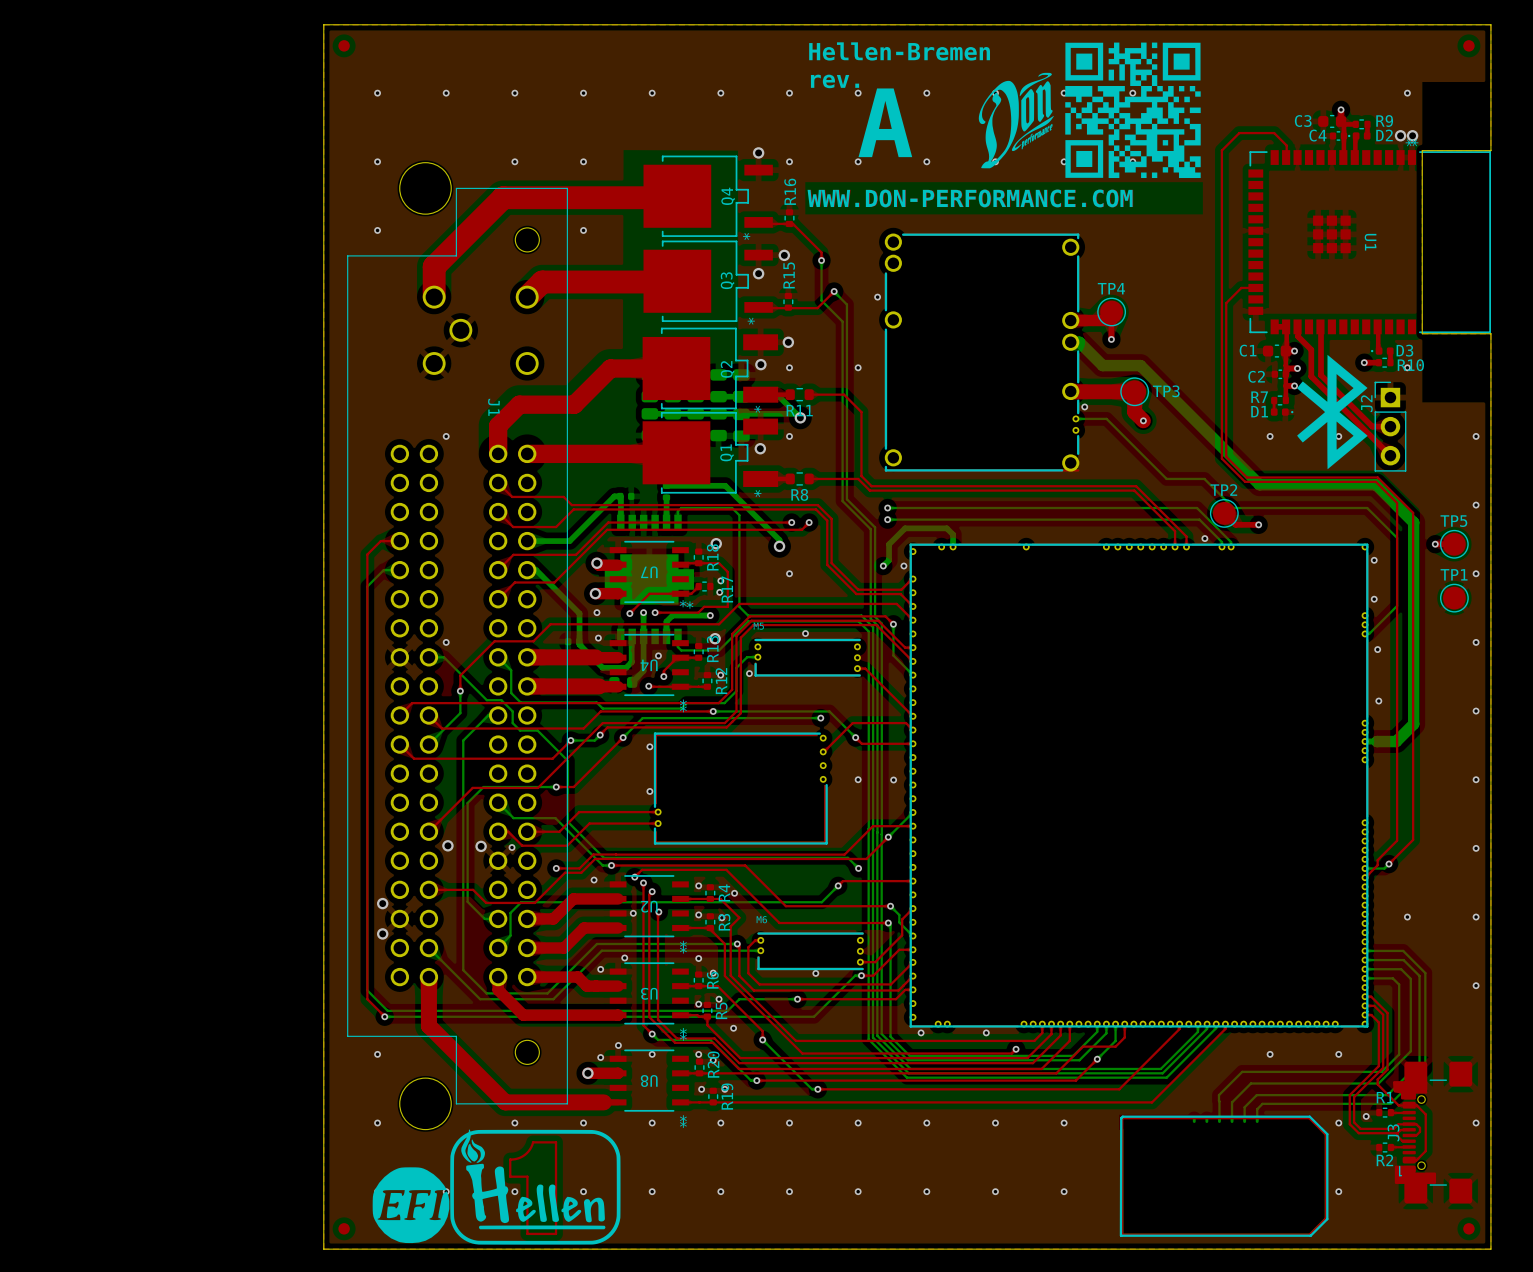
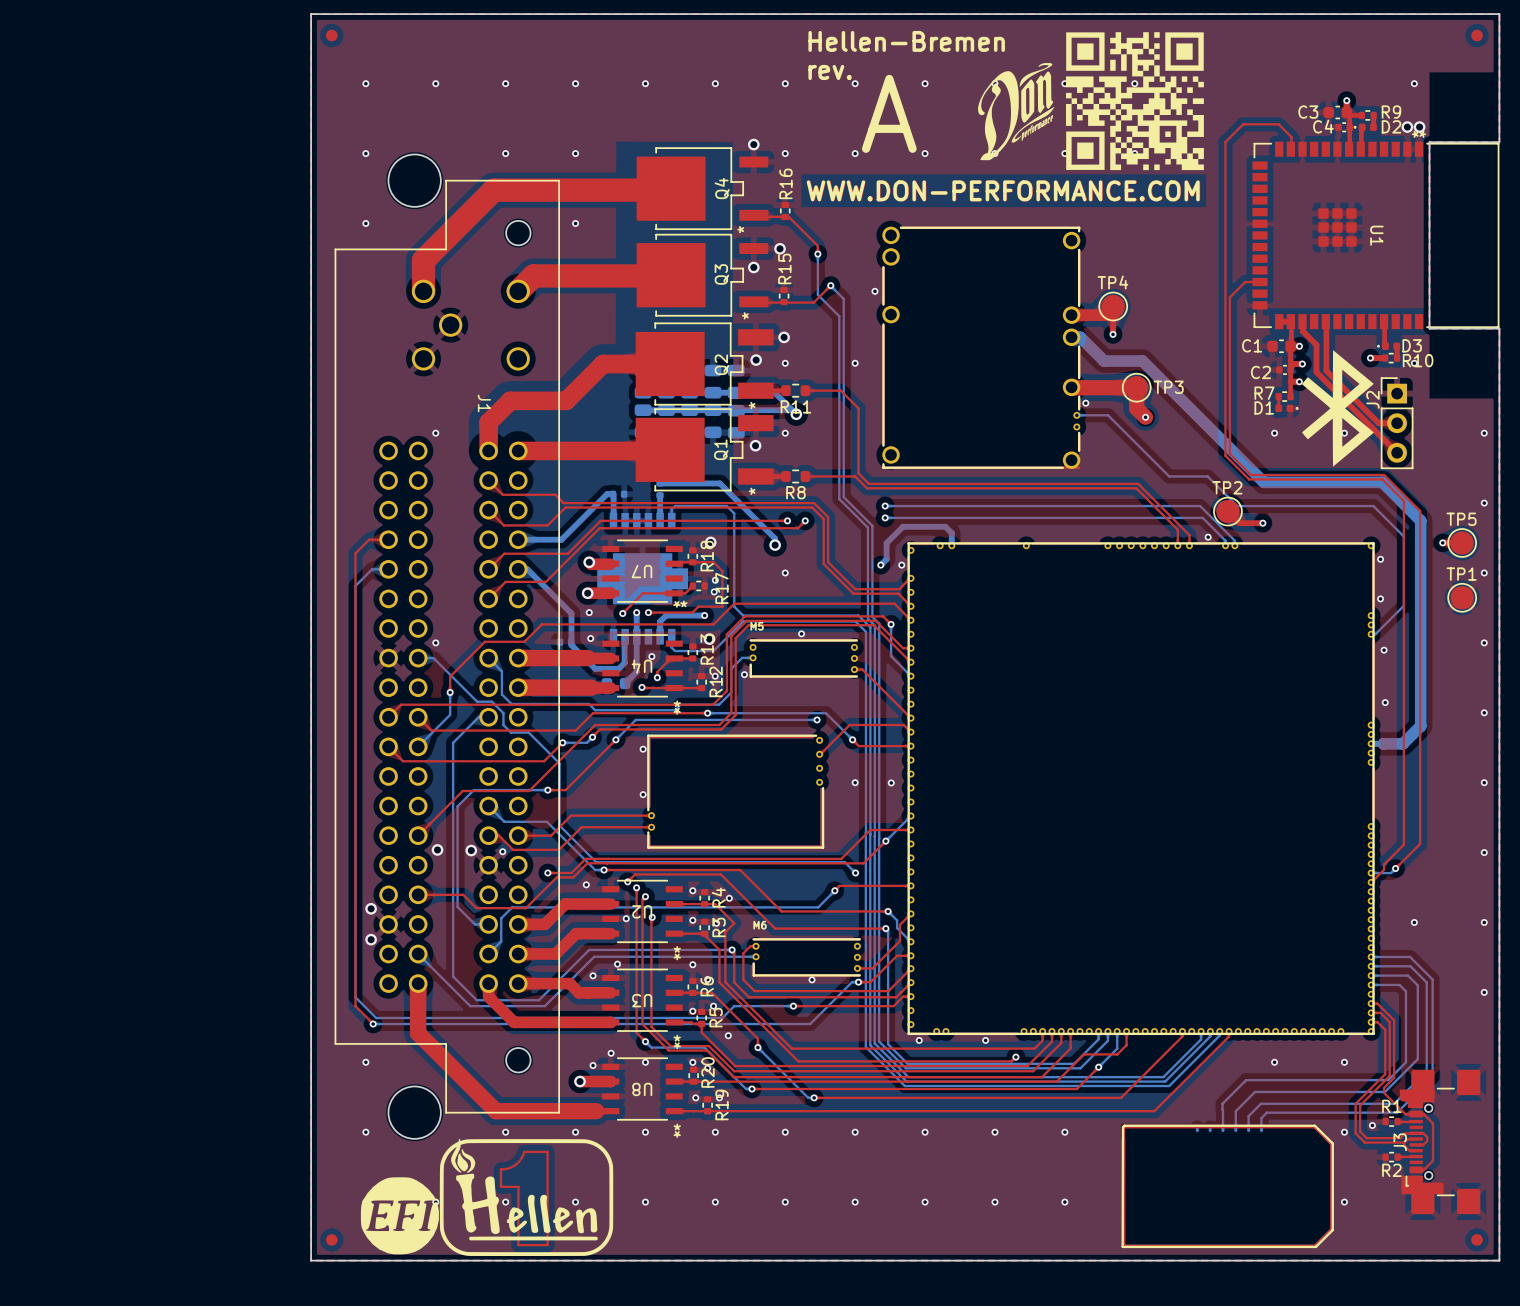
via: (1476, 1123) -> none

